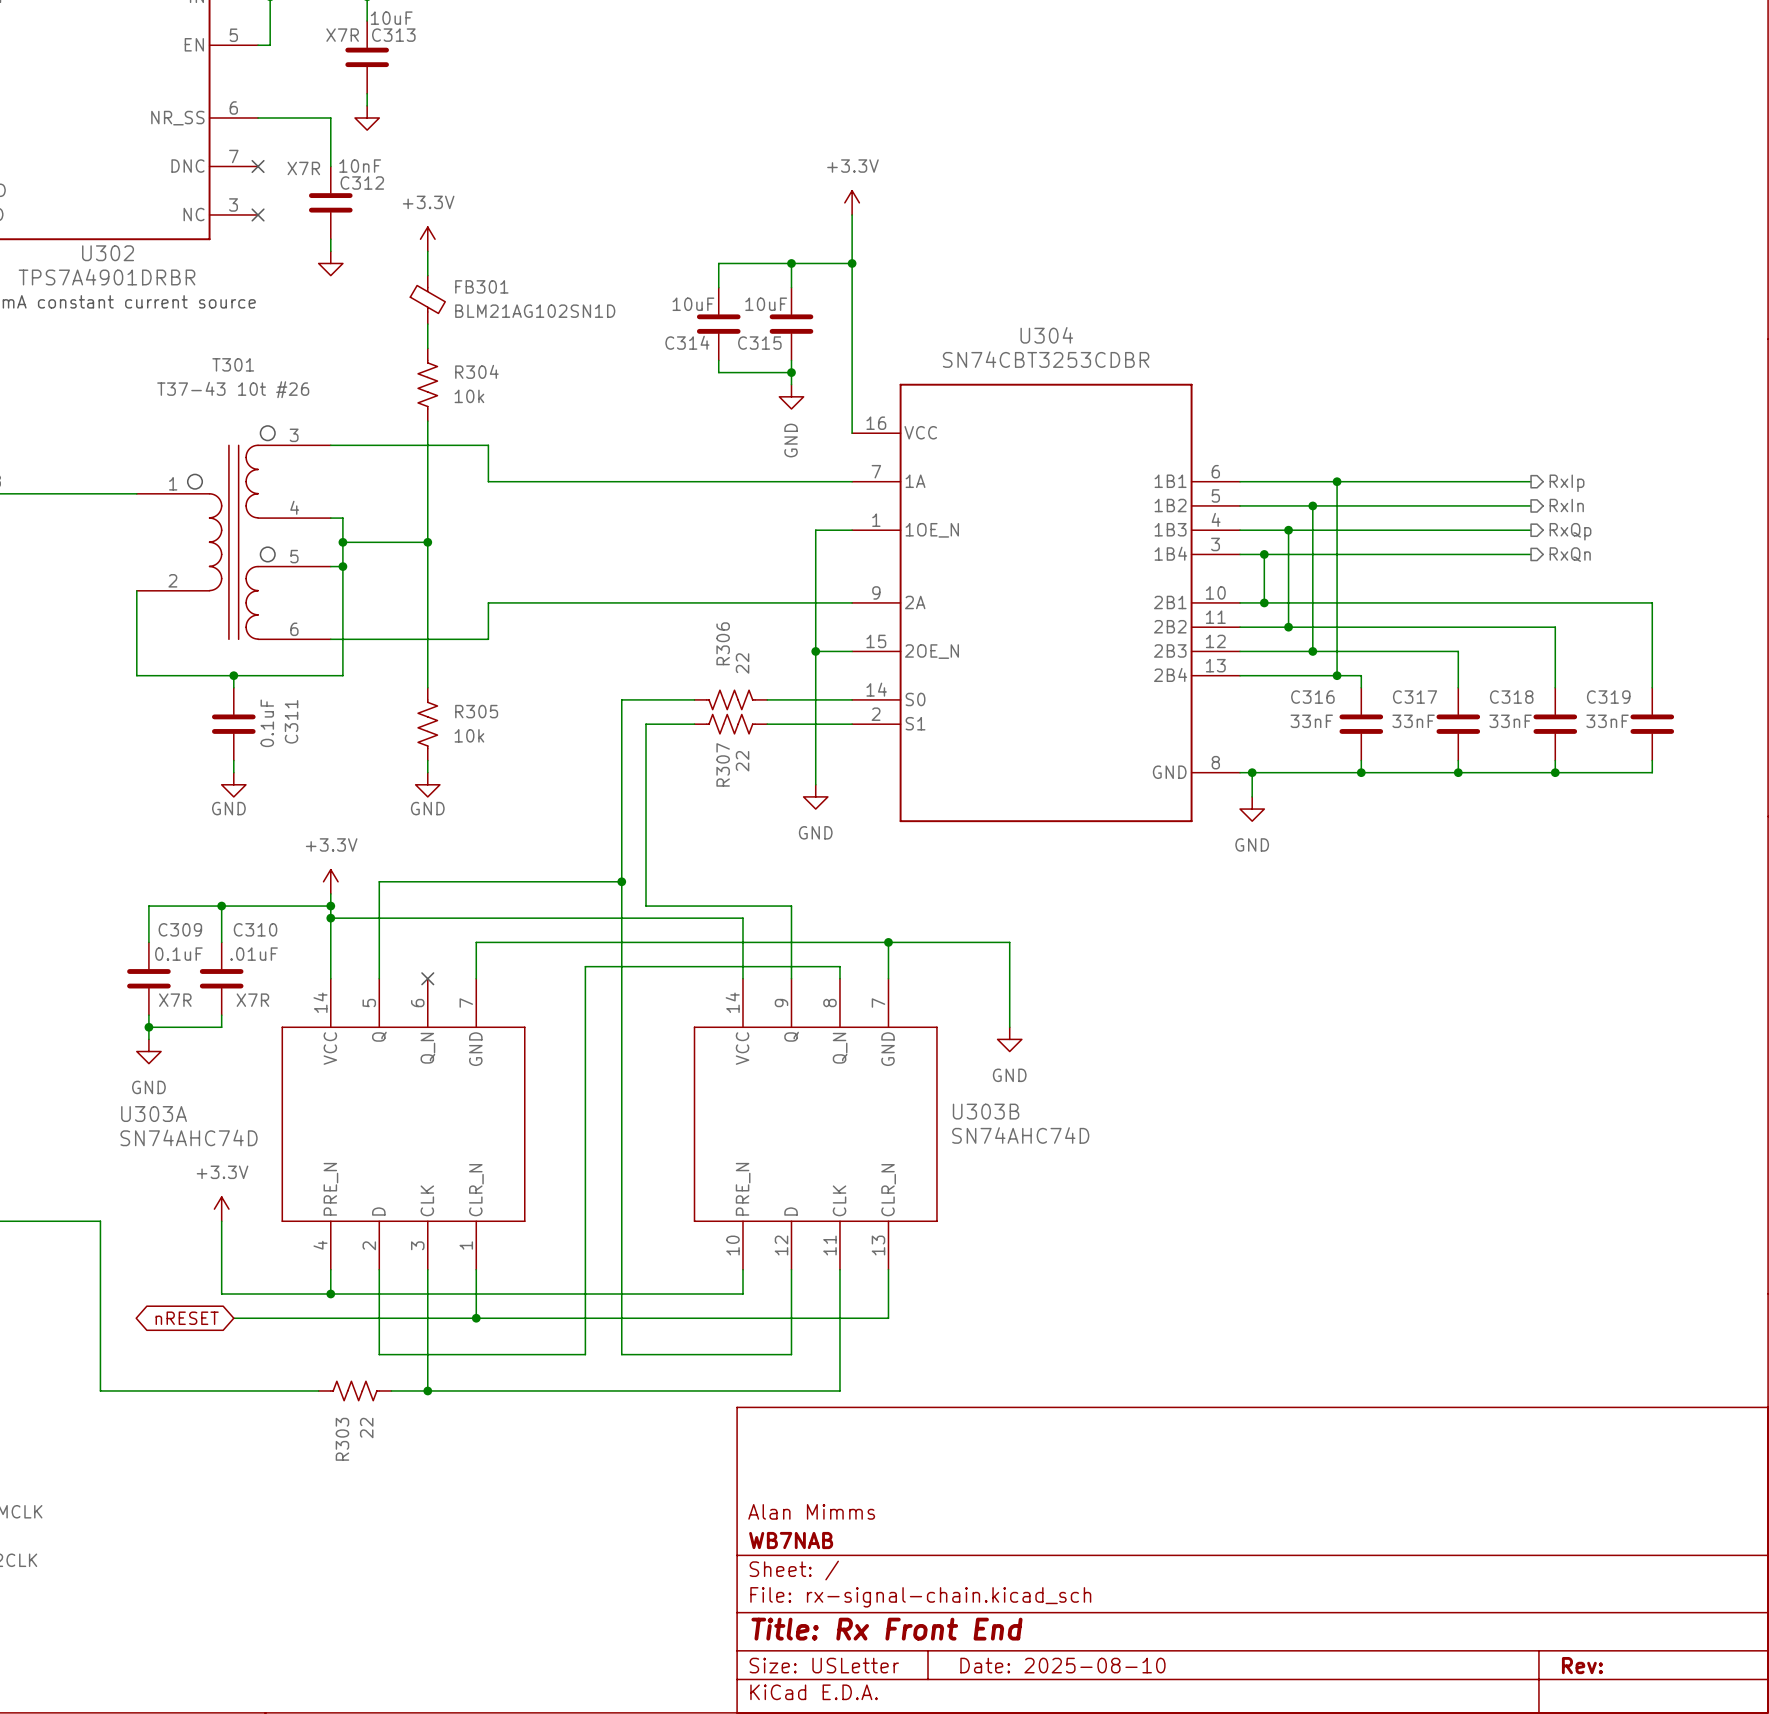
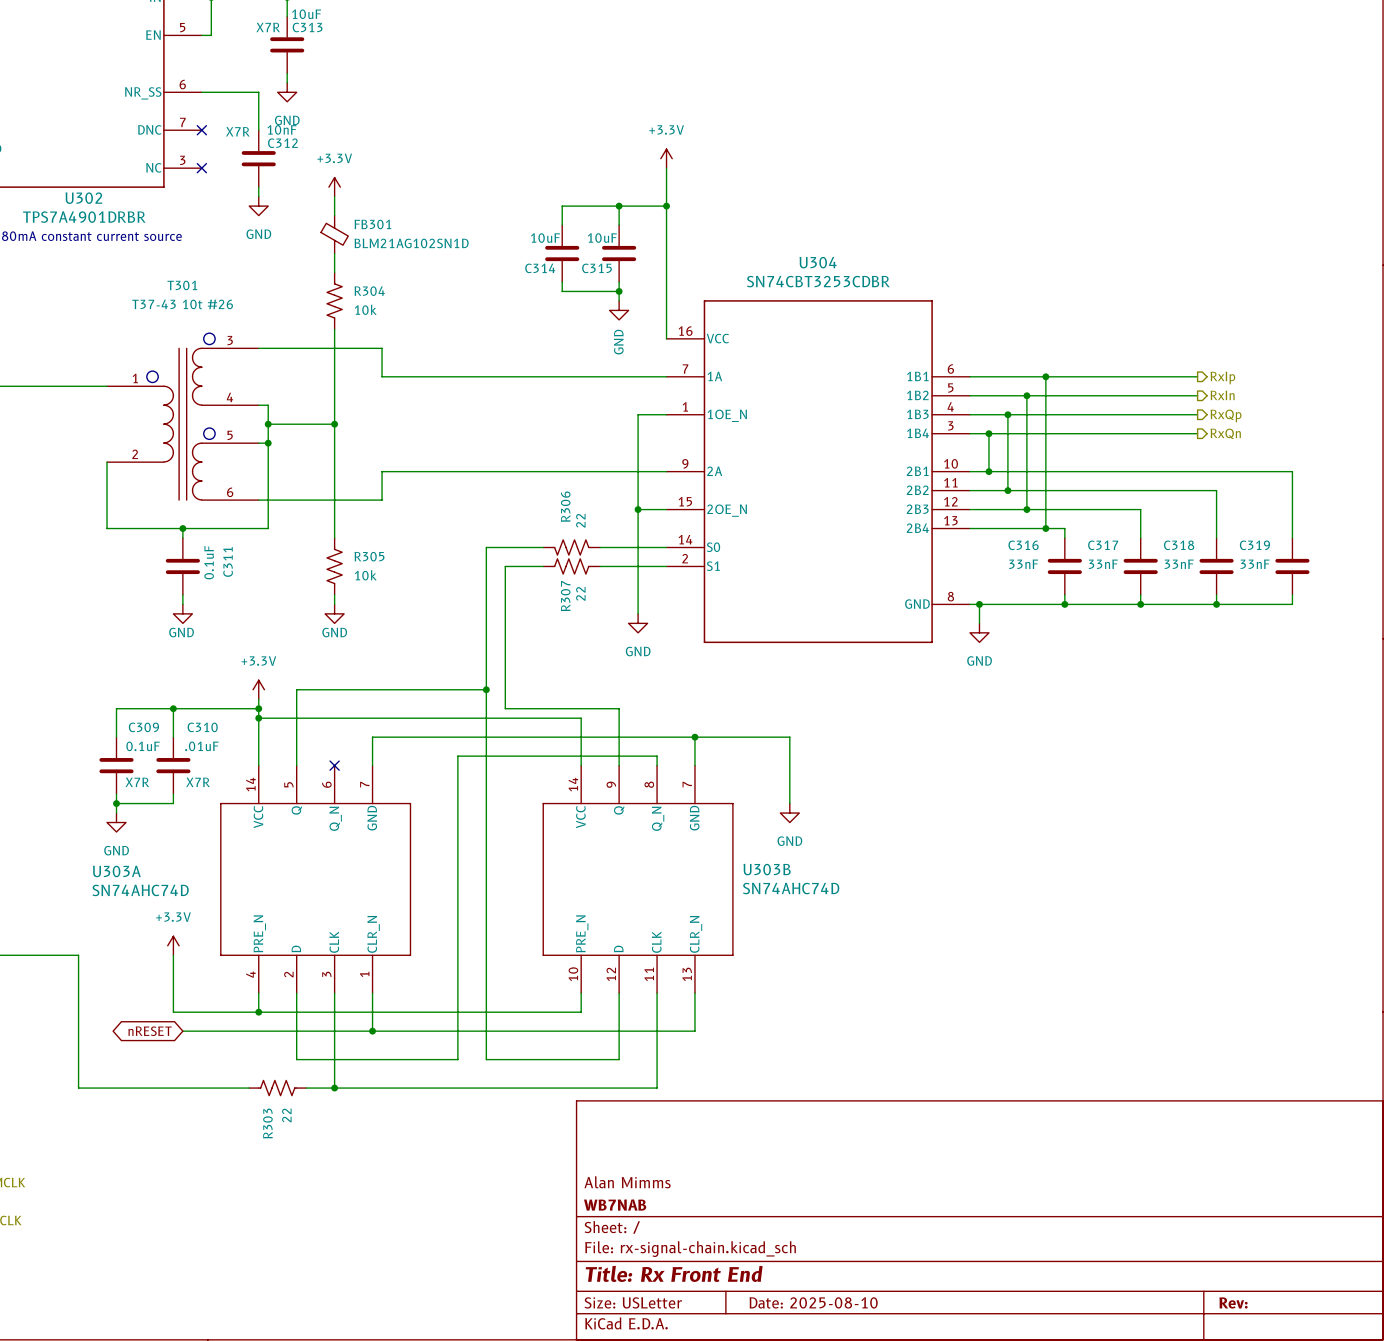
power symbol text: none -> GND (287, 120)
power symbol text: none -> GND (258, 234)

